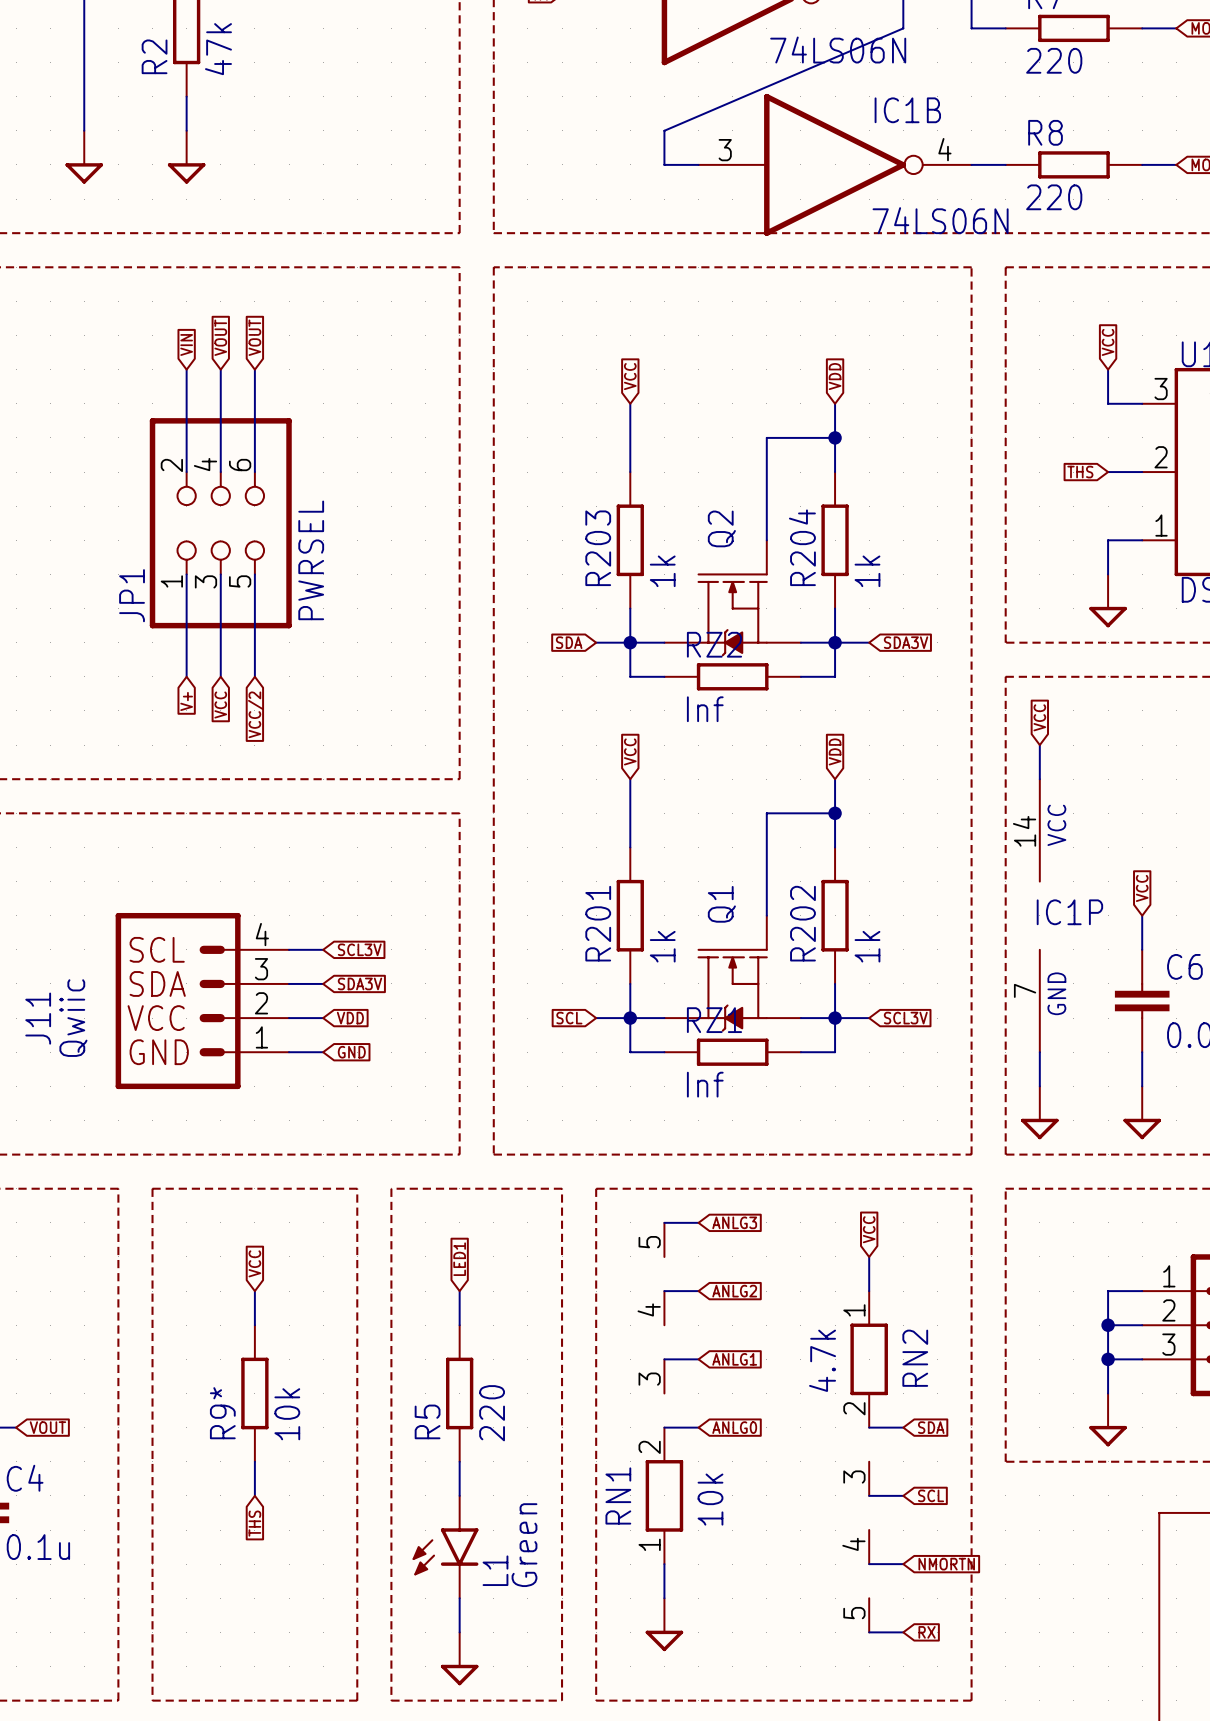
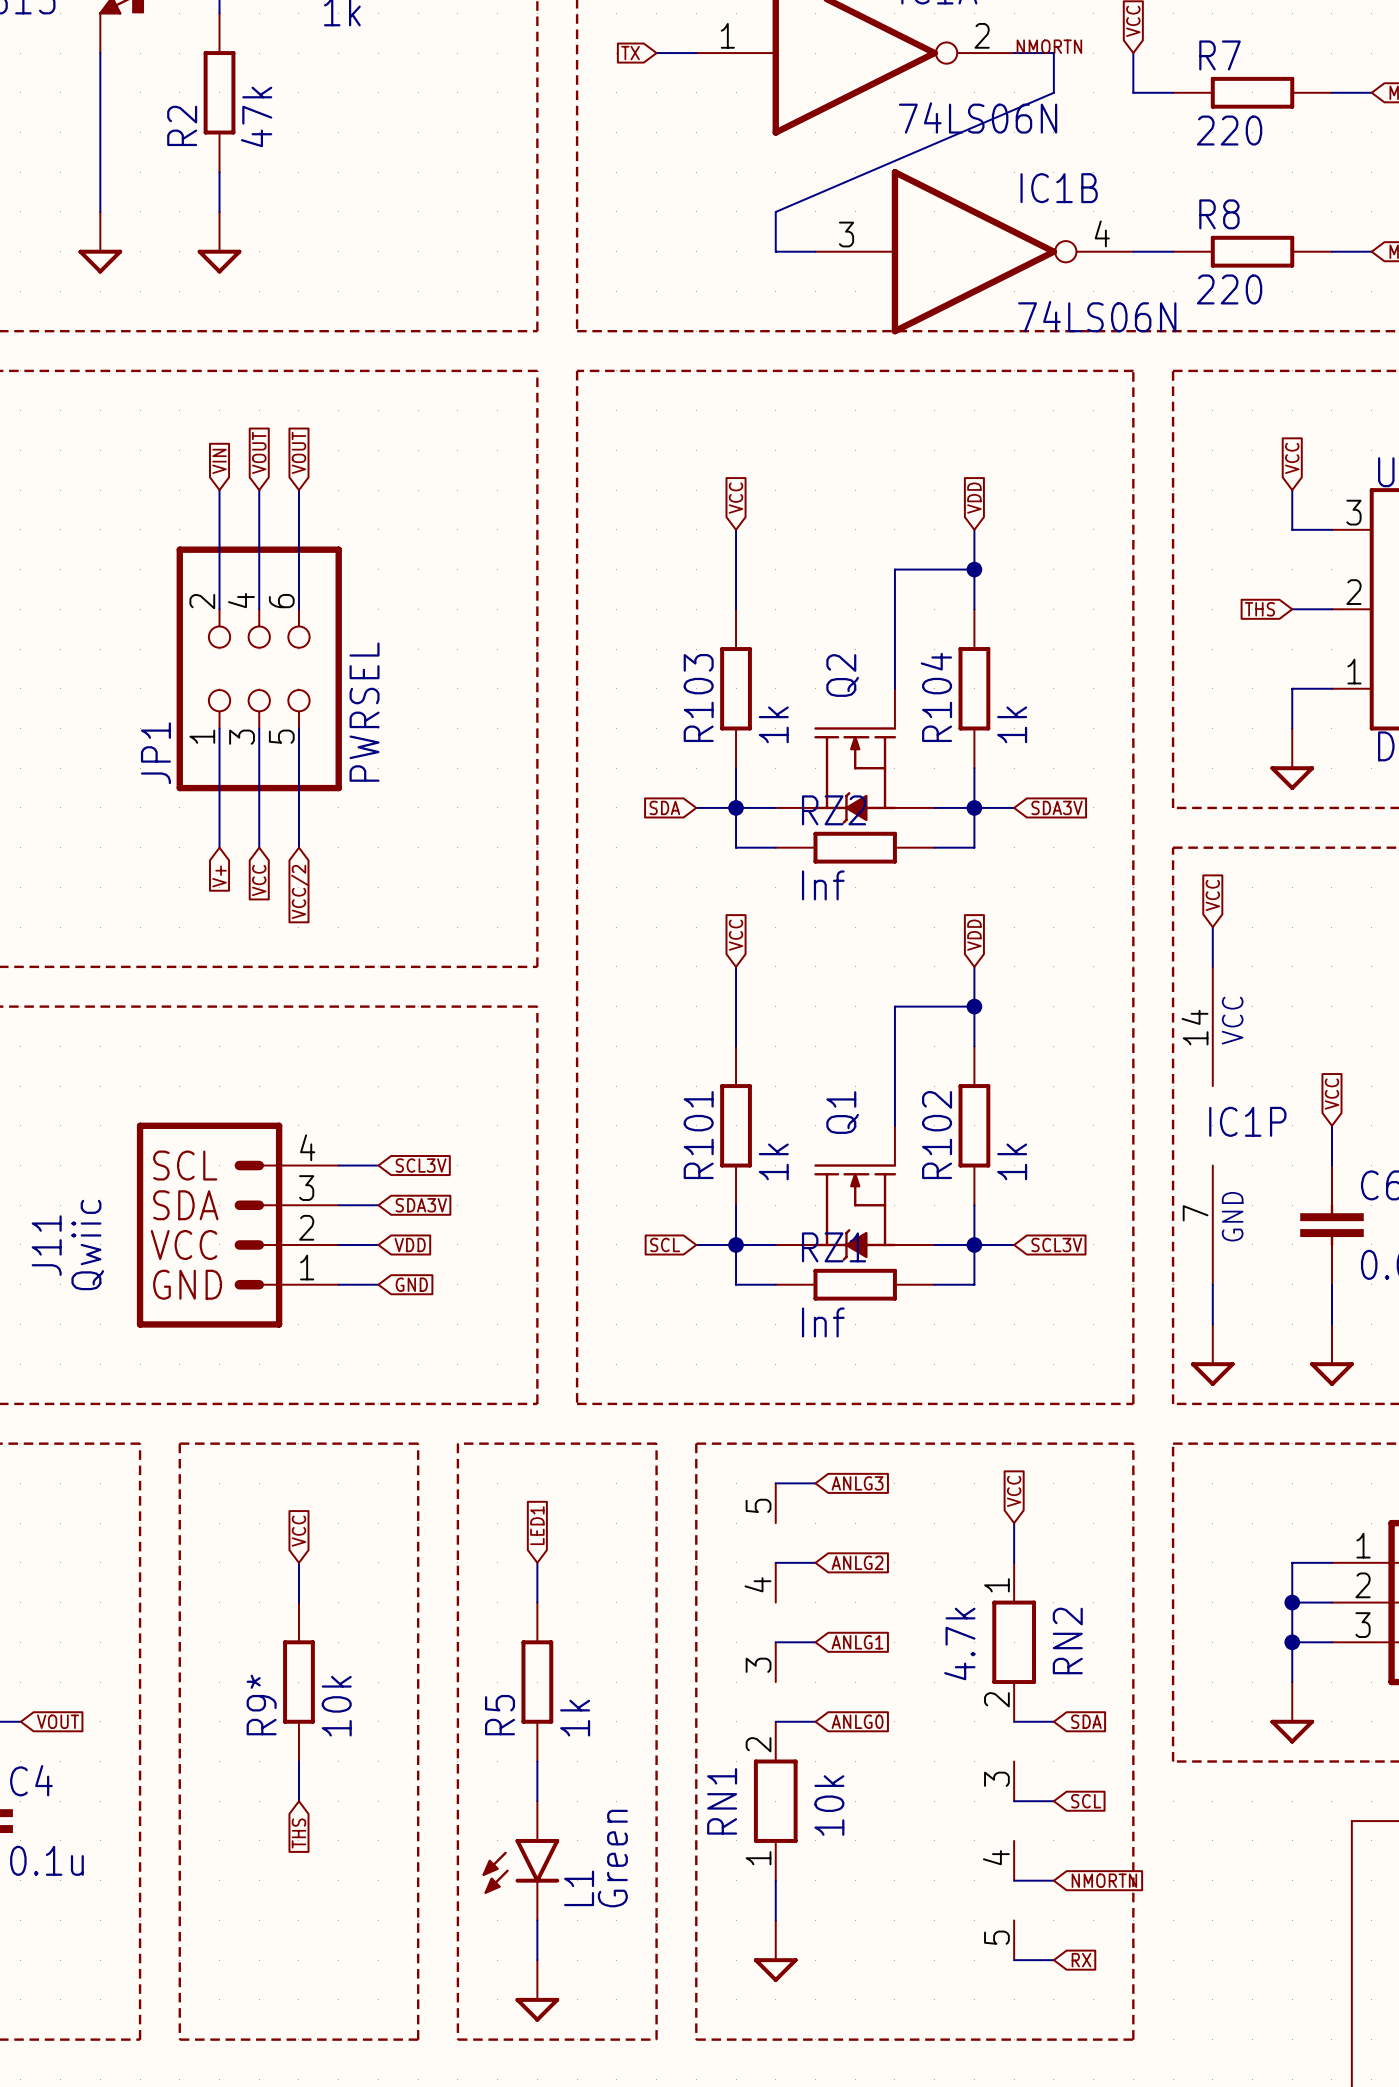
R204 name: R204 (802, 547) -> R104 (936, 697)
R203 name: R203 (598, 548) -> R103 (698, 698)
R201 name: R201 (598, 923) -> R101 (698, 1135)
R202 name: R202 (802, 923) -> R102 (937, 1135)
R5 value: 220 (492, 1413) -> 1k (575, 1718)

